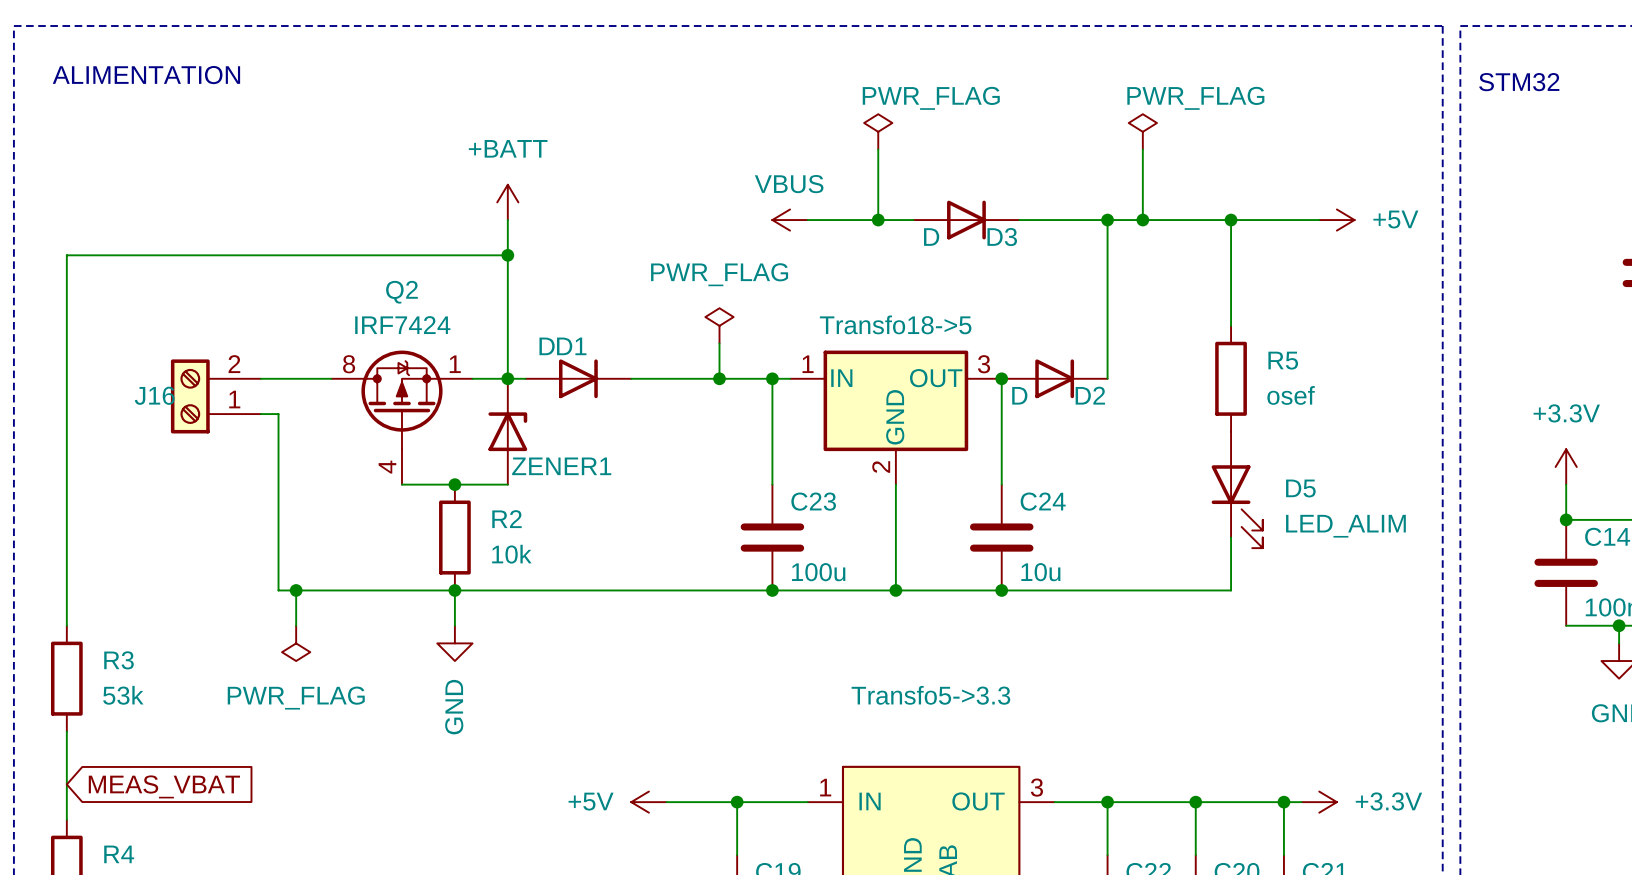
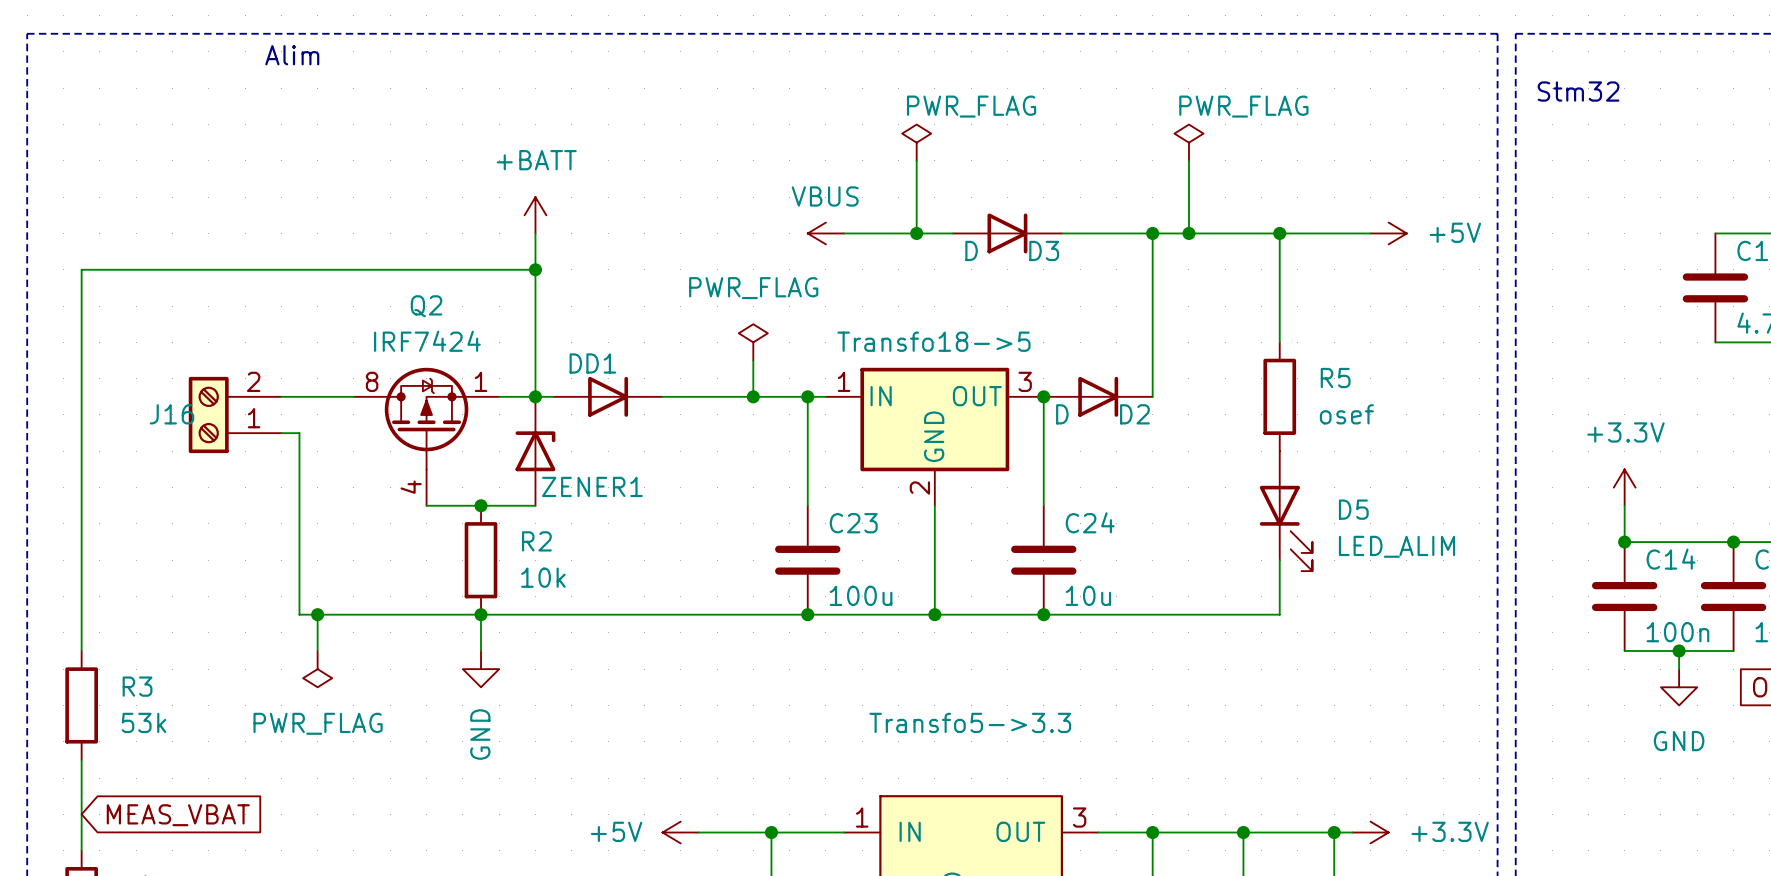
text: none -> Alim (292, 55)
text: ALIMENTATION (146, 75) -> none
text: STM32 (1519, 82) -> Stm32 (1578, 91)

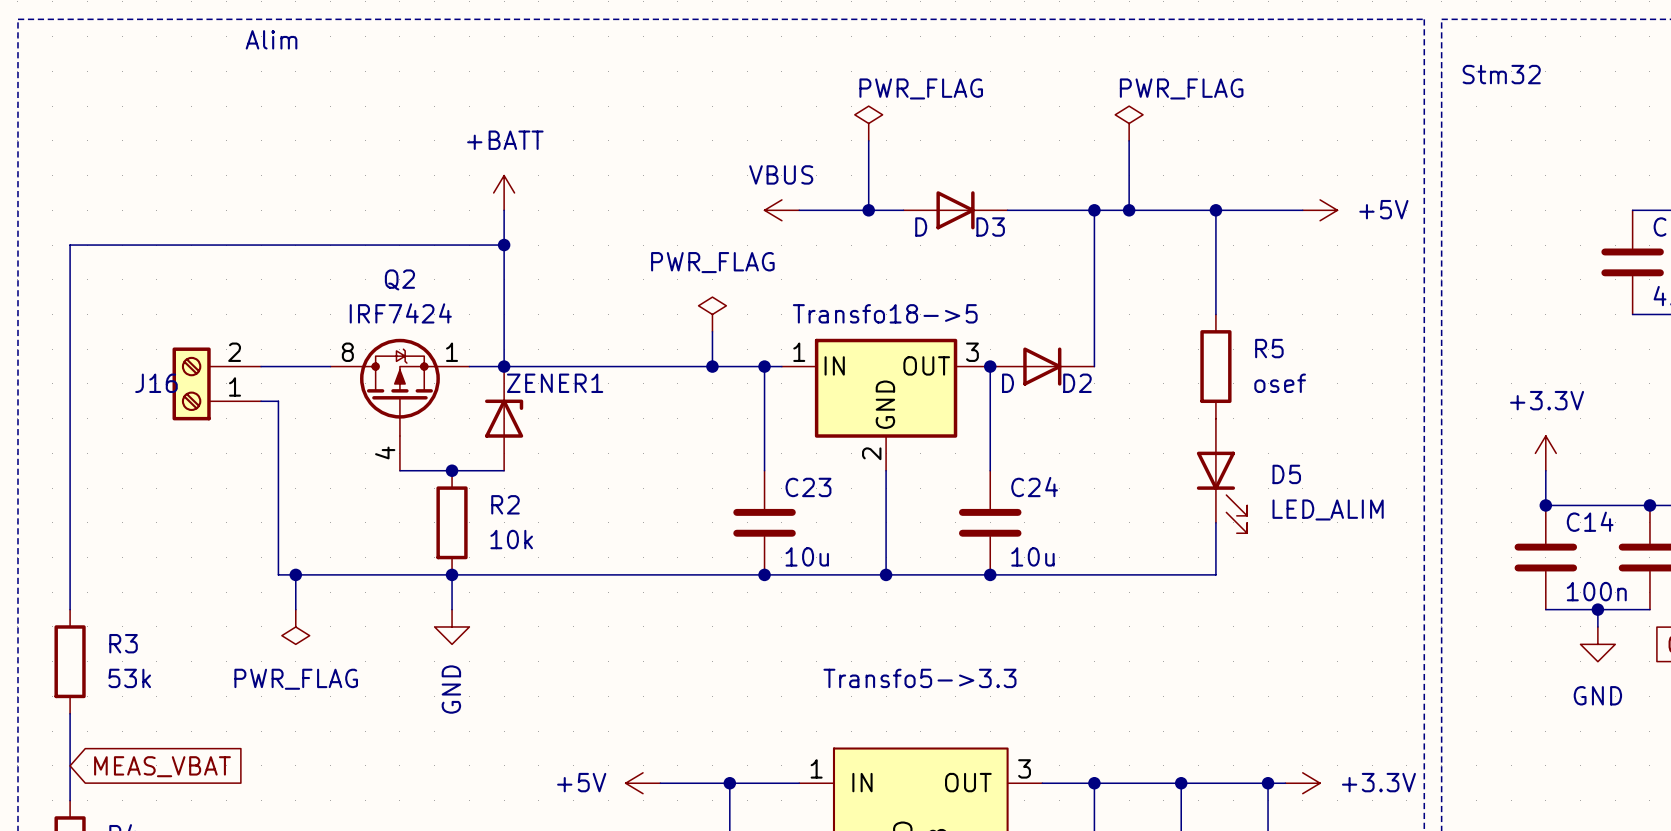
D1: D (608, 396) -> none
ZENER1 name position: ZENER1 (592, 486) -> ZENER1 (555, 383)
C23 value: 100u (861, 595) -> 10u (807, 556)

